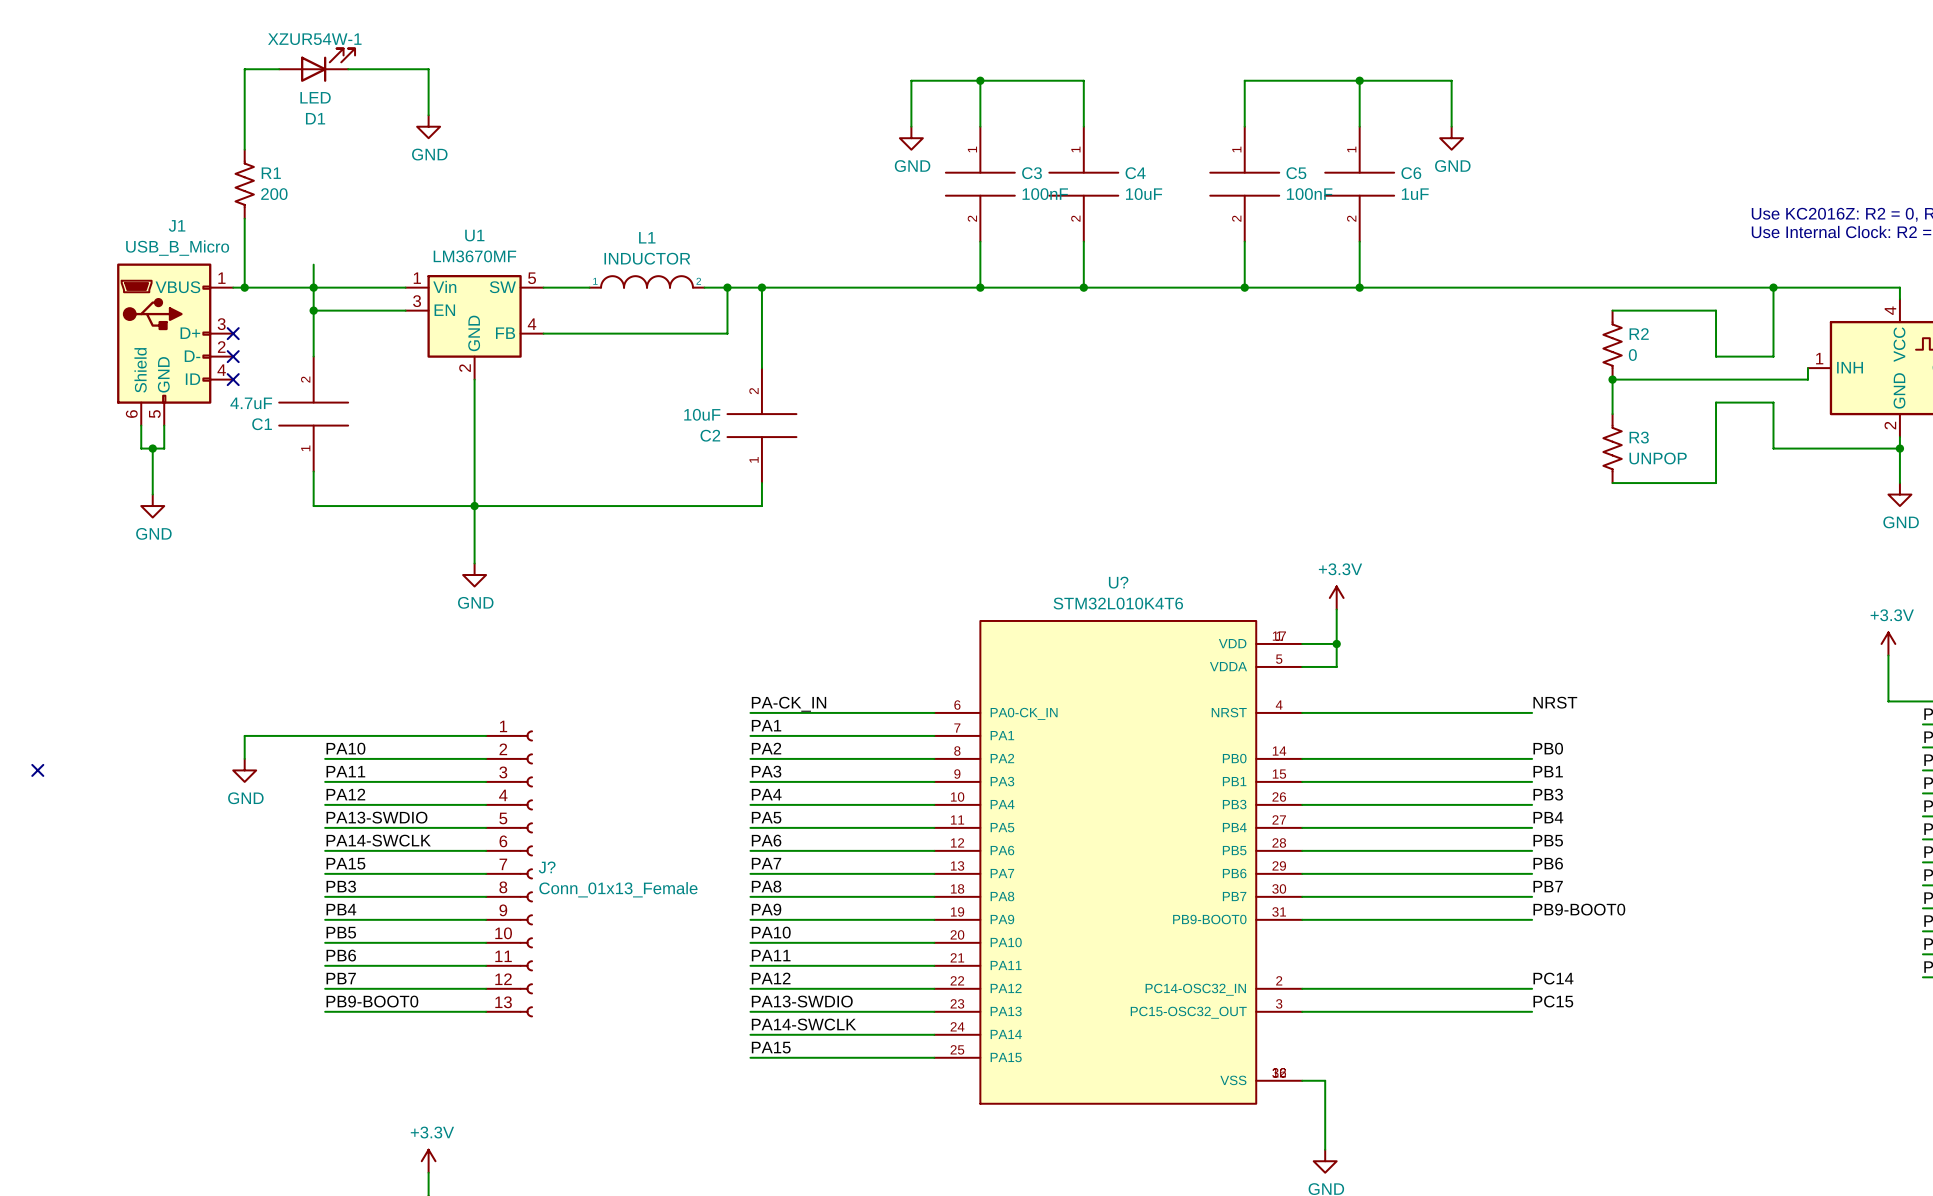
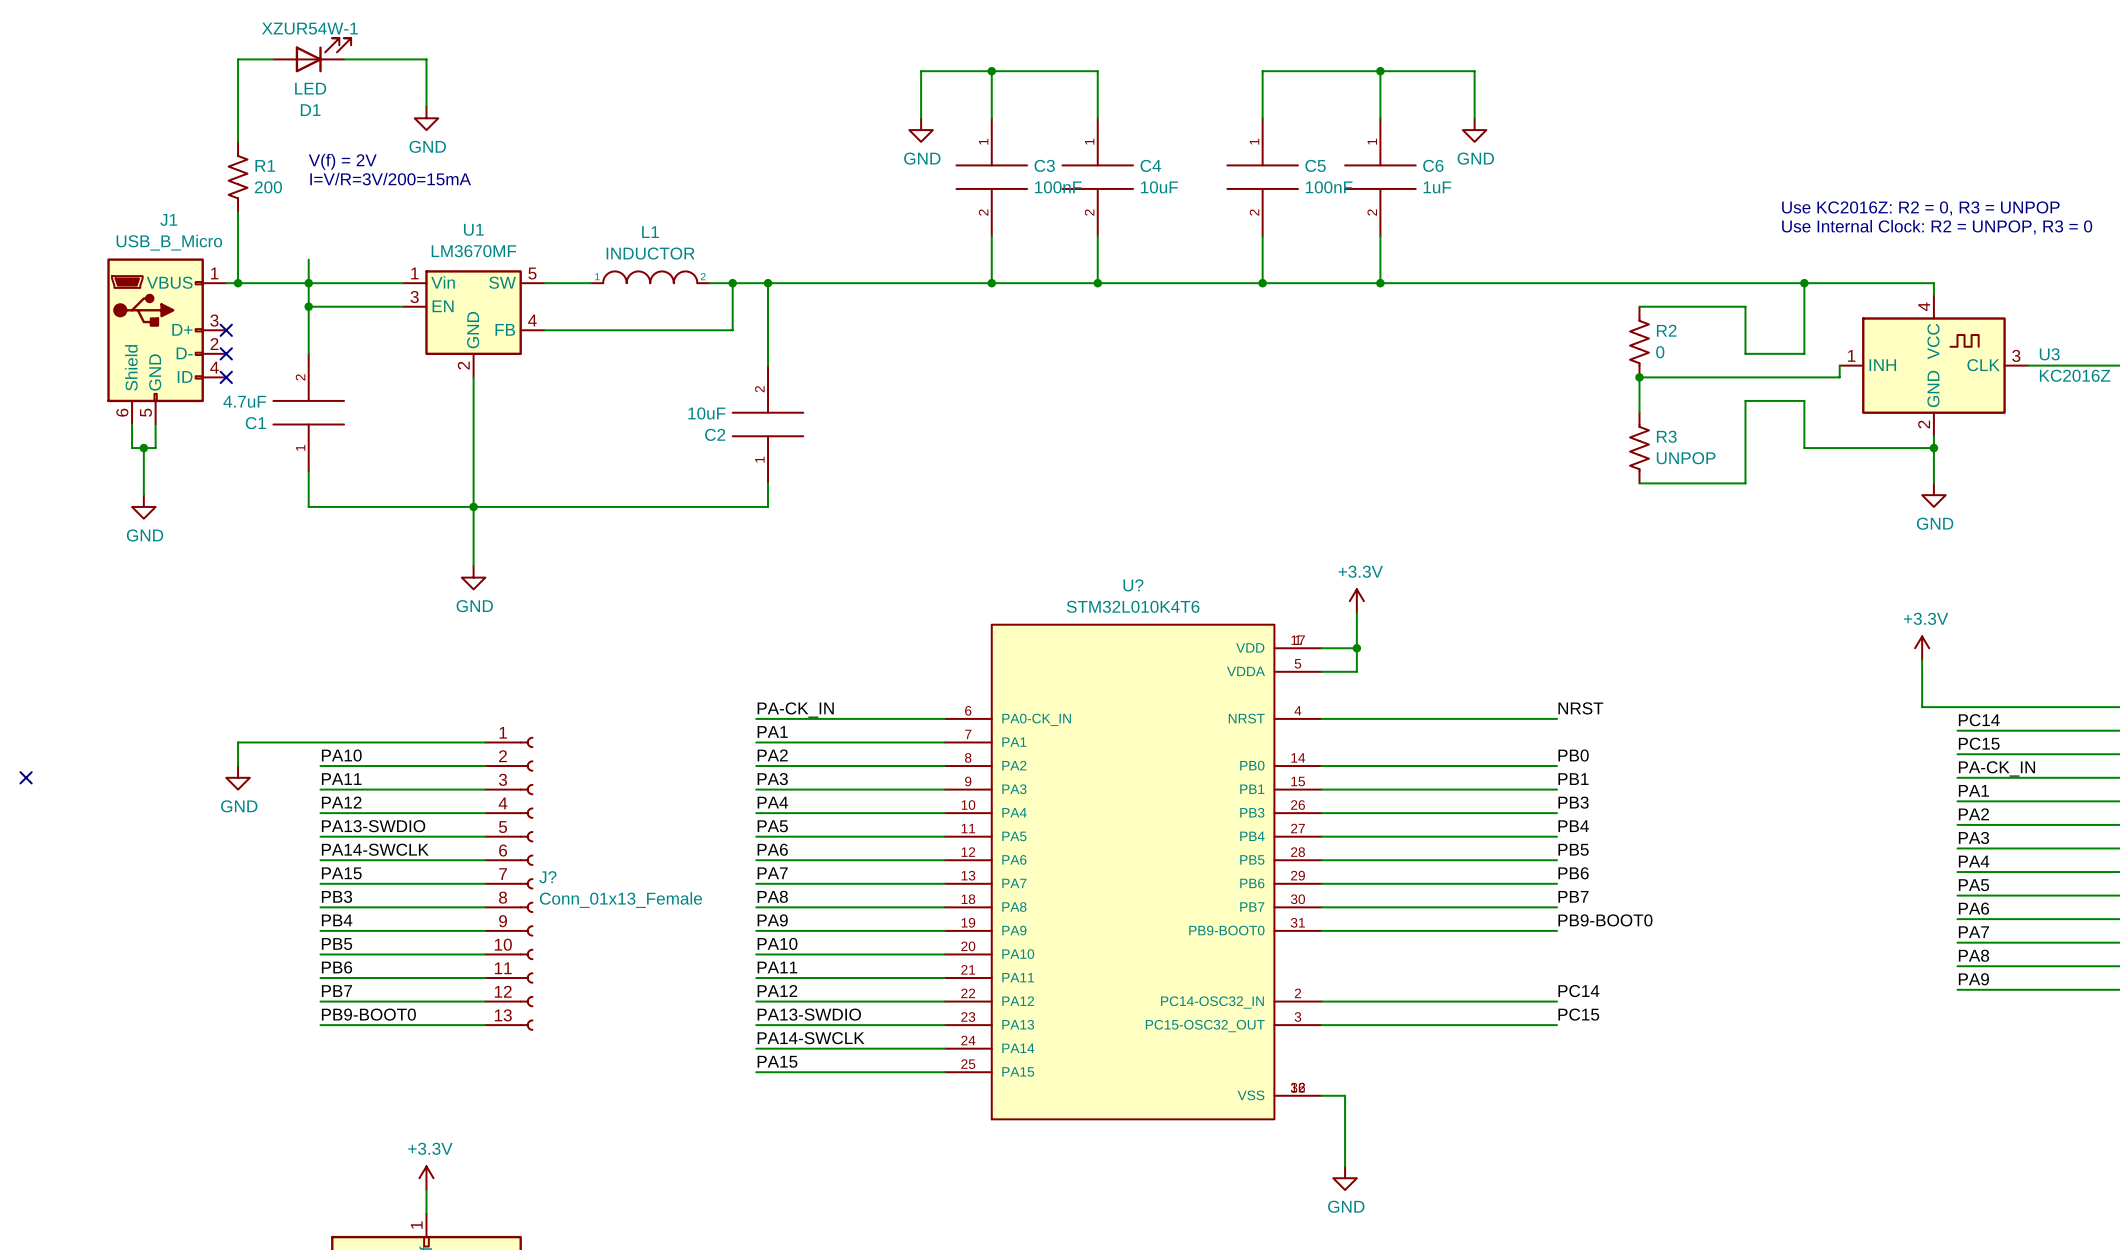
text: none -> V(f) = 2V (342, 161)
text: none -> I=V/R=3V/200=15mA (390, 179)

